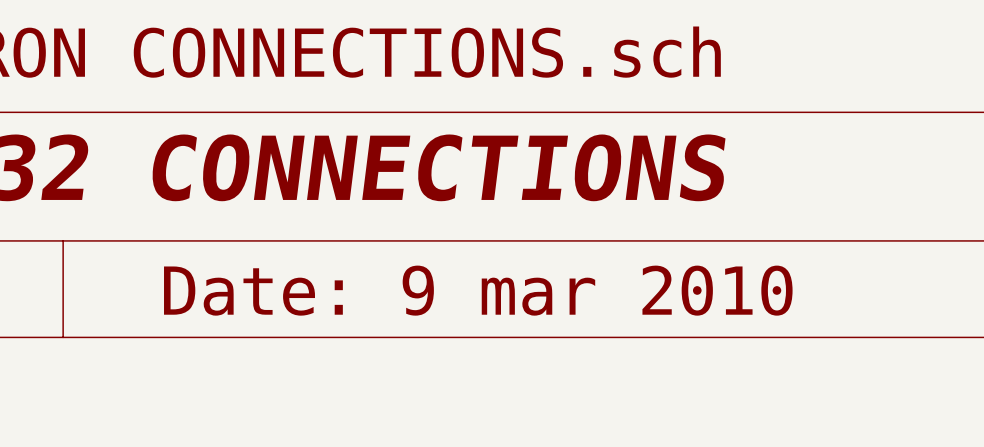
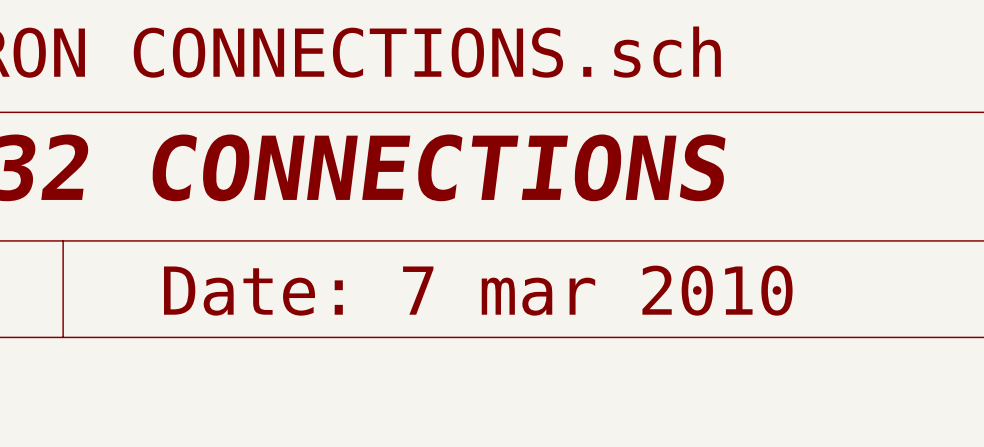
title block: Date: 9 mar 2010 (478, 290) -> Date: 7 mar 2010 (478, 290)

